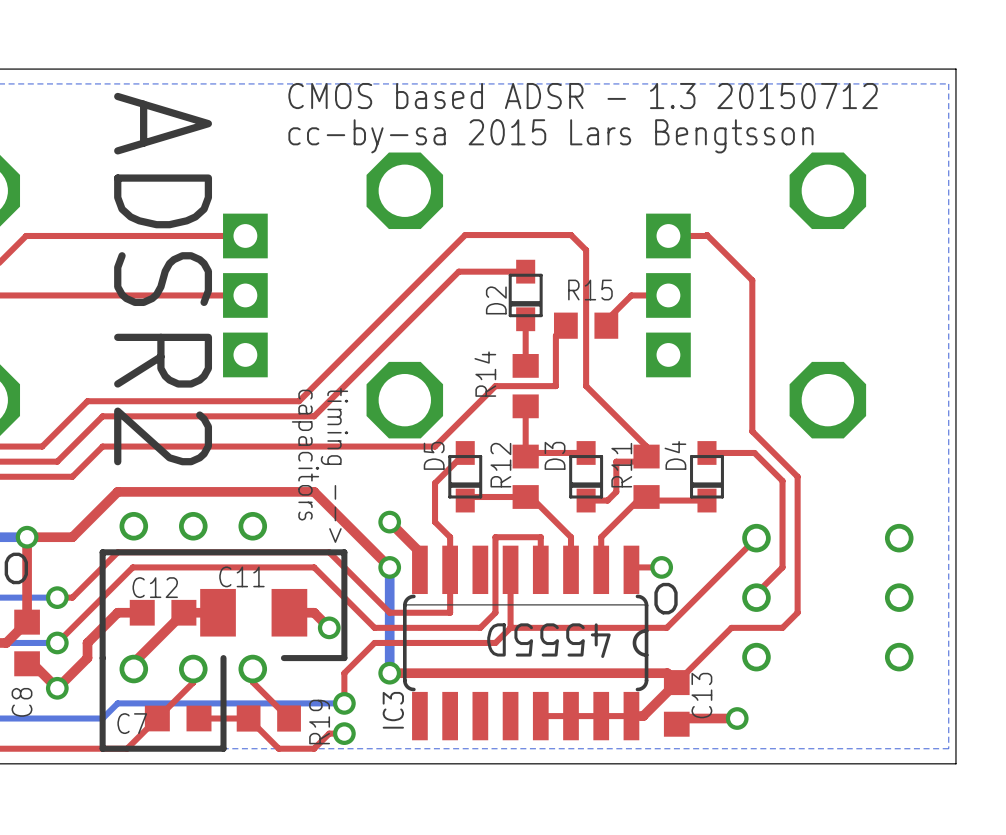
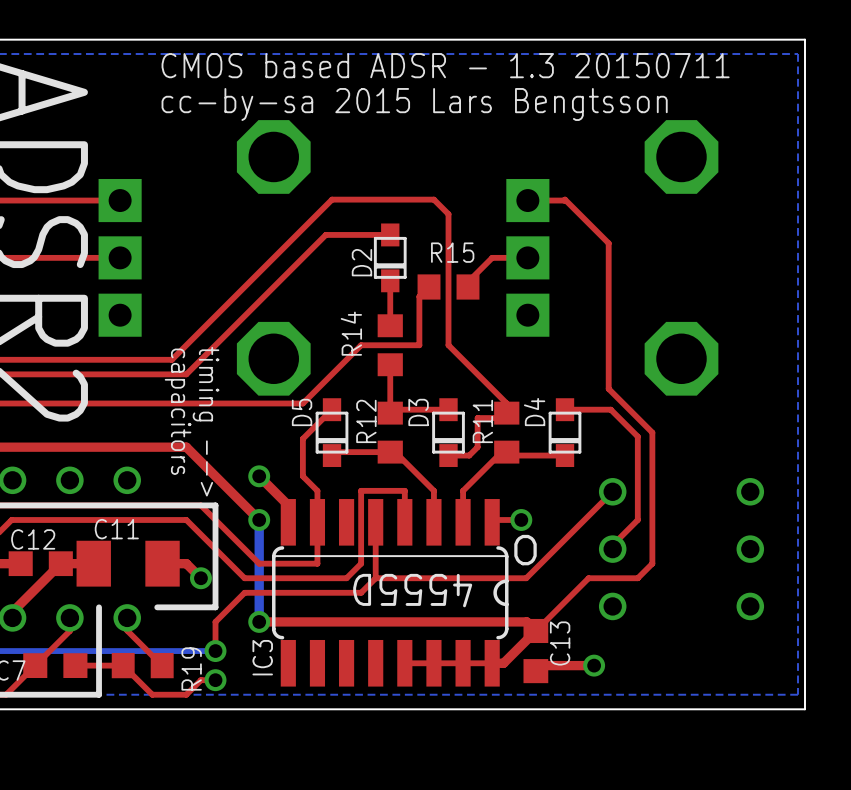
text: CMOS based ADSR - 1.3 20150712 (583, 96) -> CMOS based ADSR - 1.3 20150711 (445, 65)

